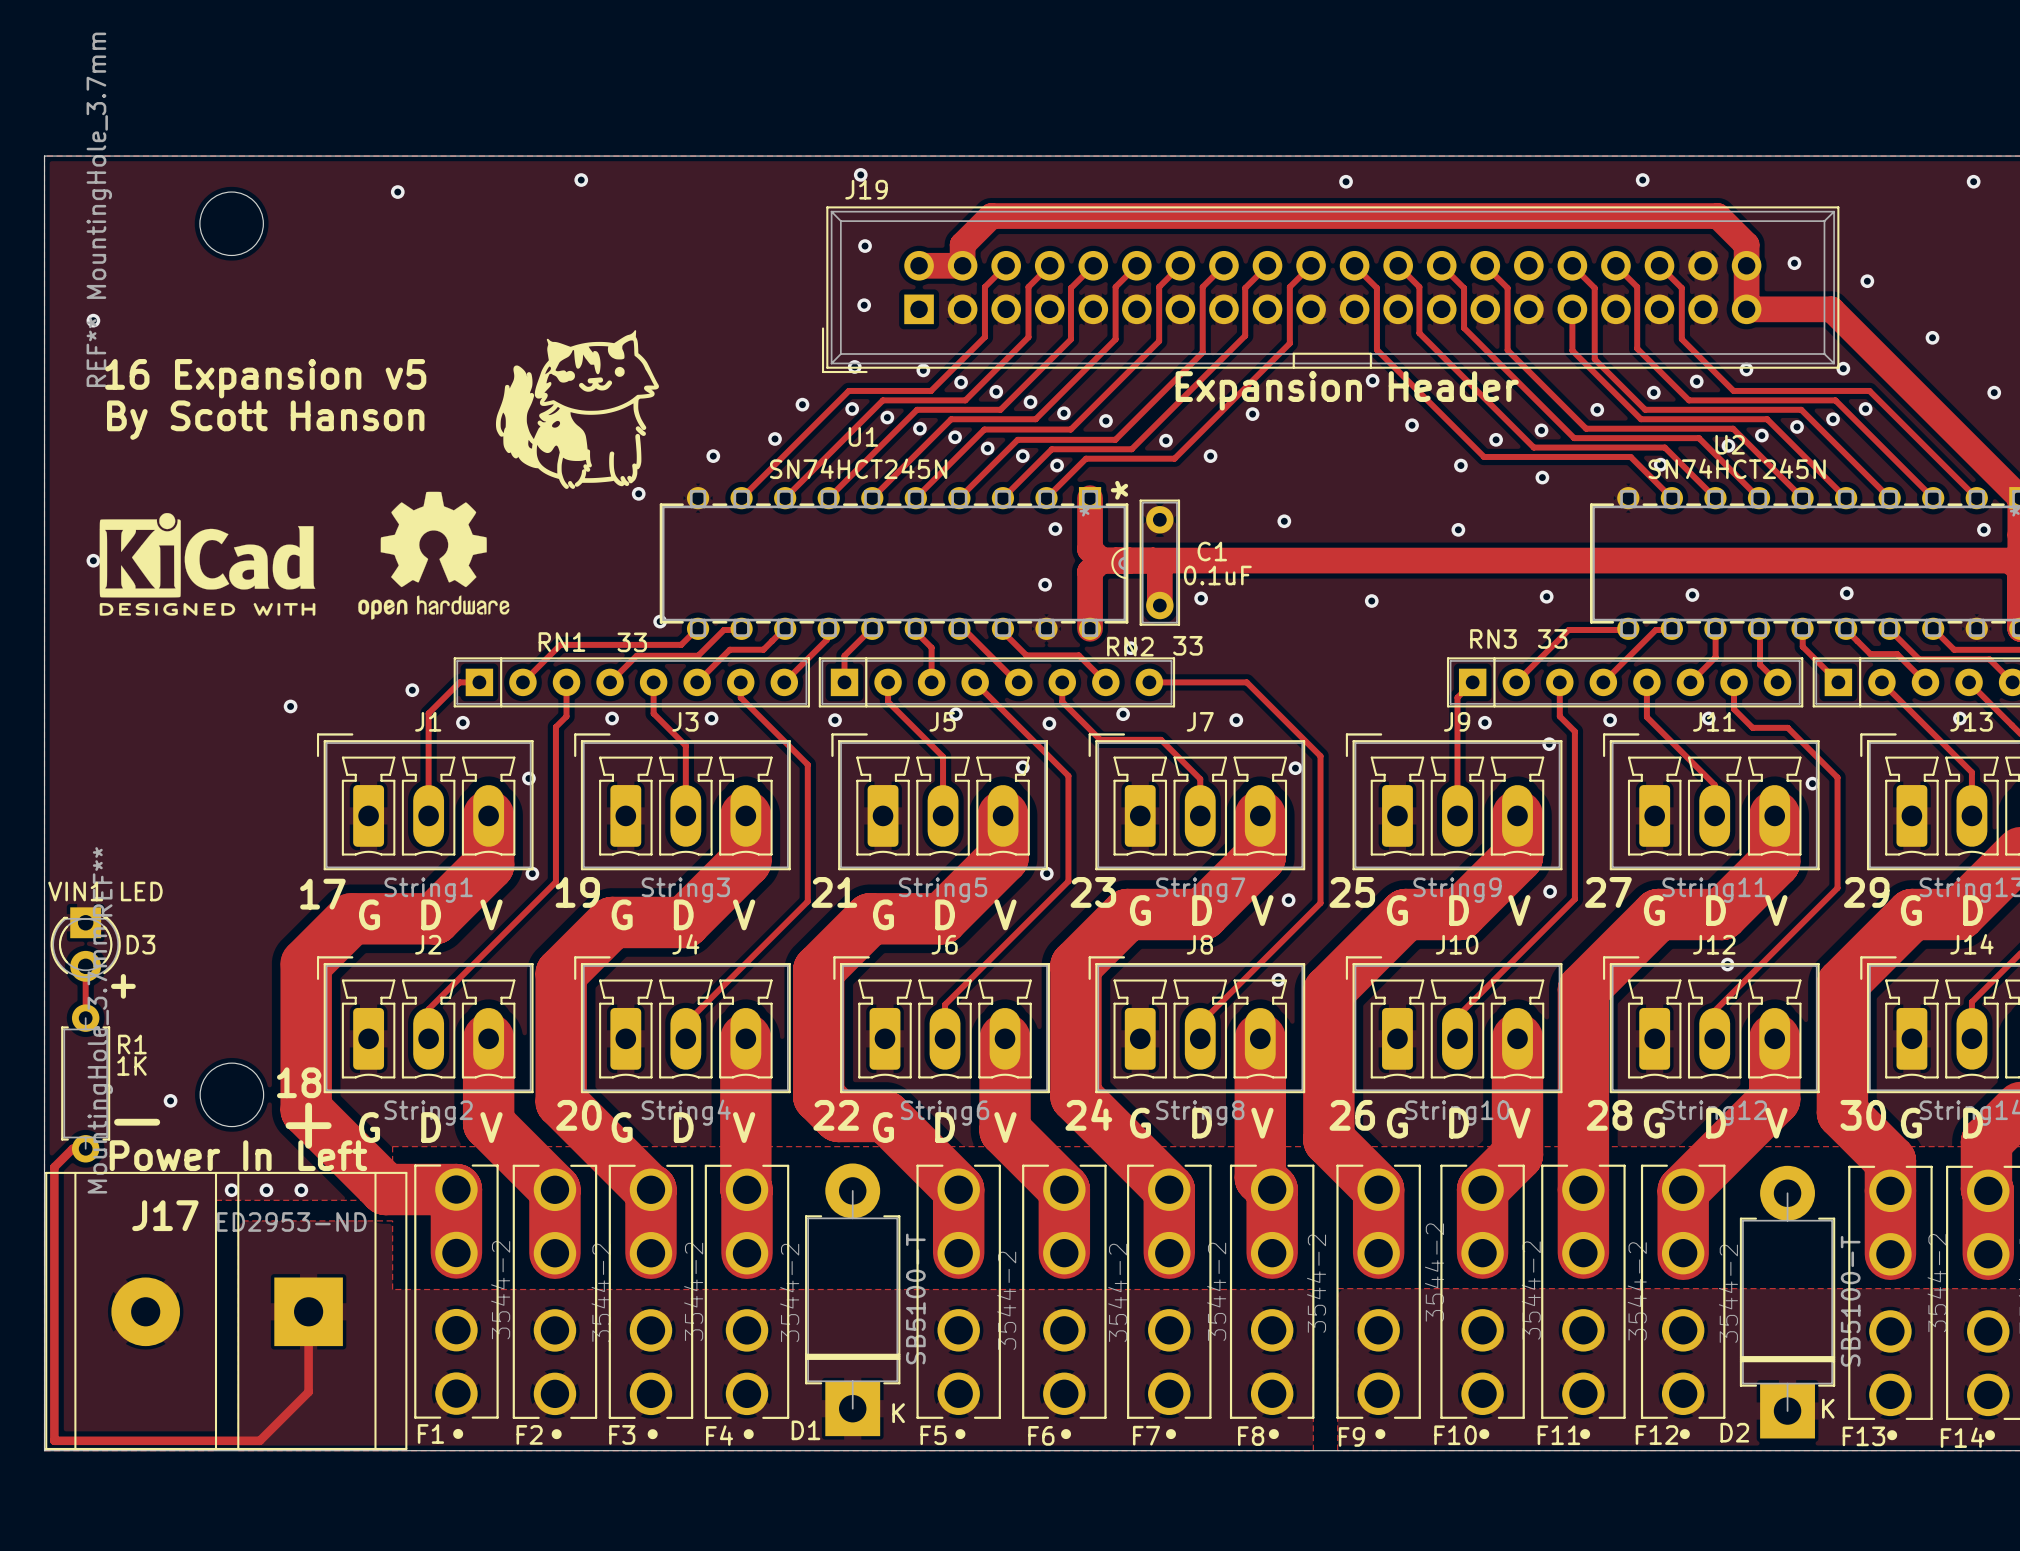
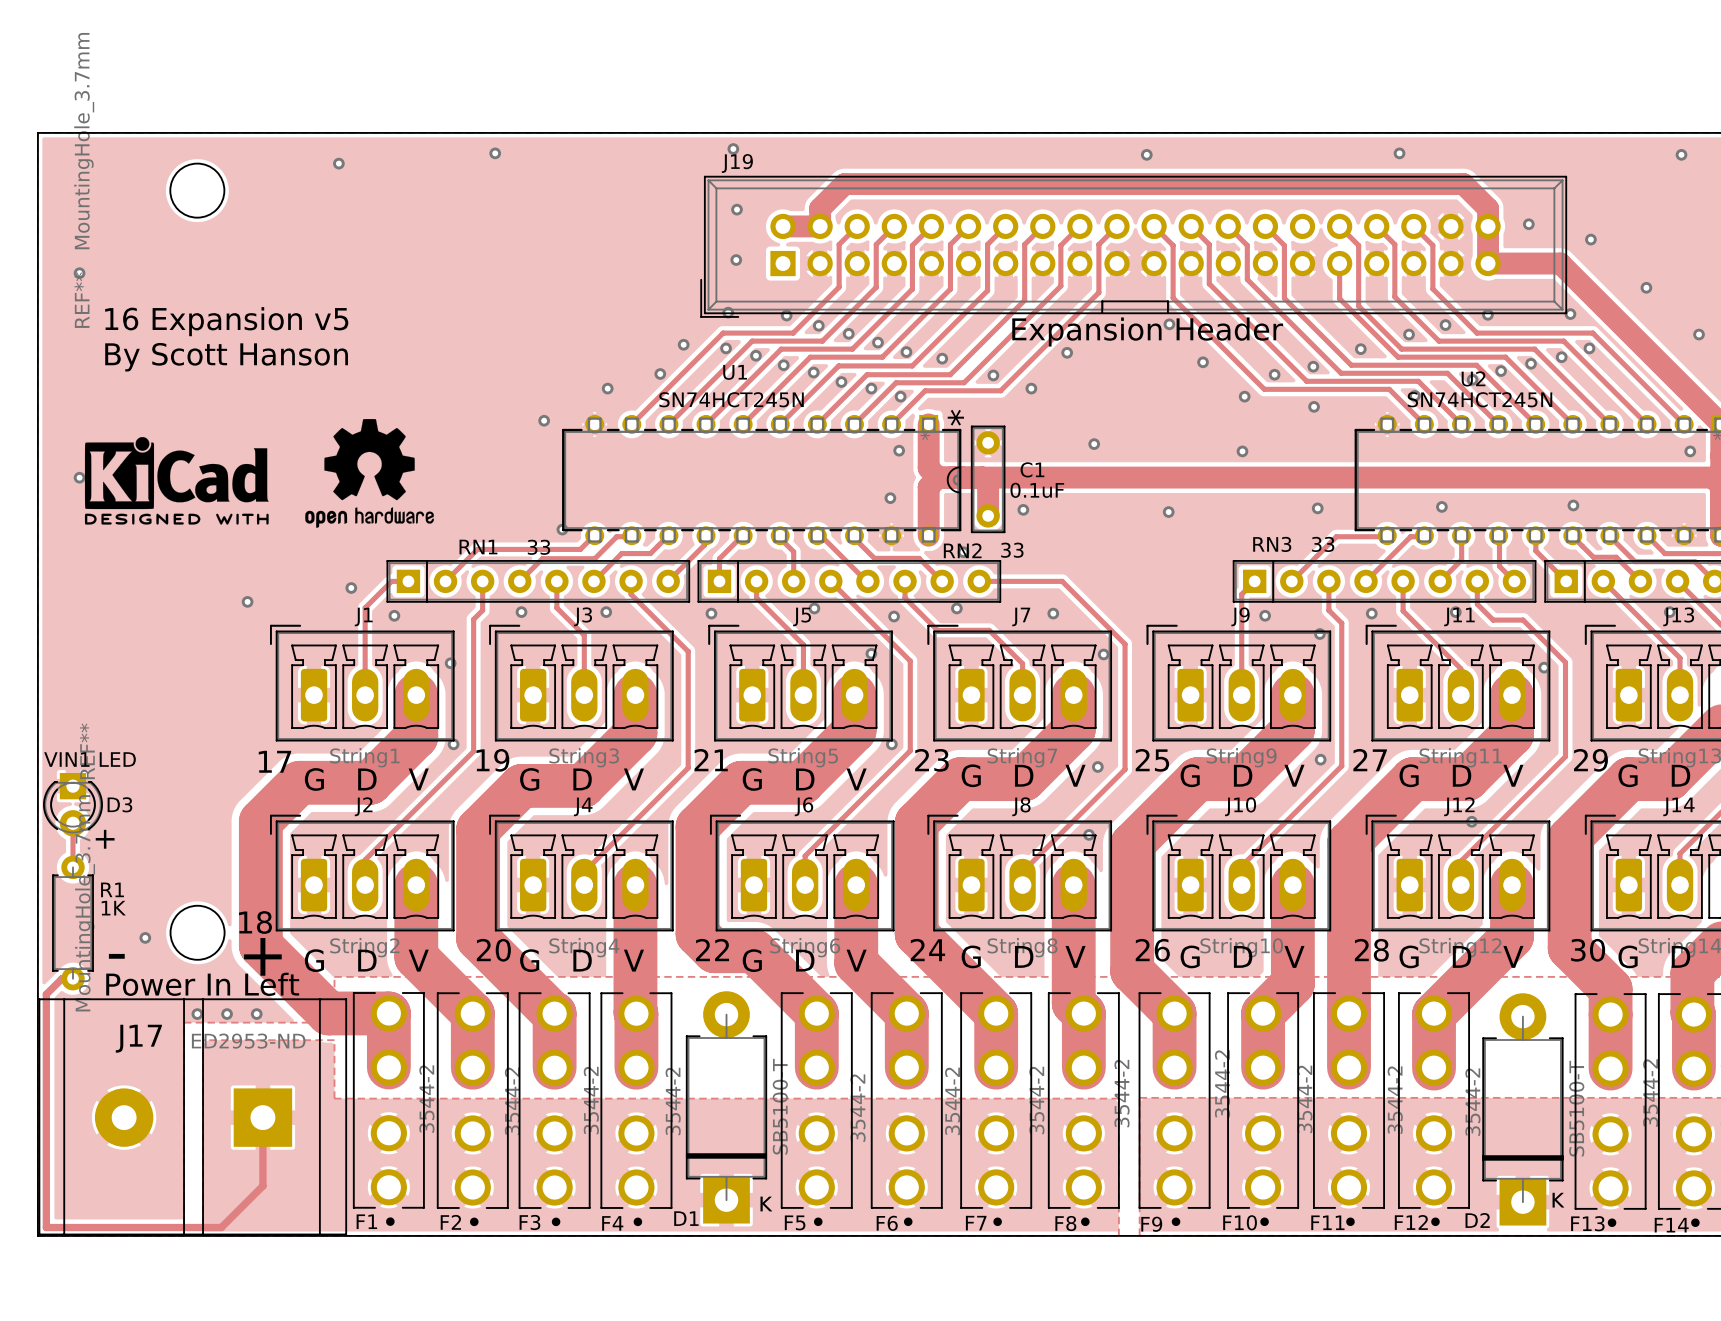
drawing: [495, 330, 659, 489] -> none

